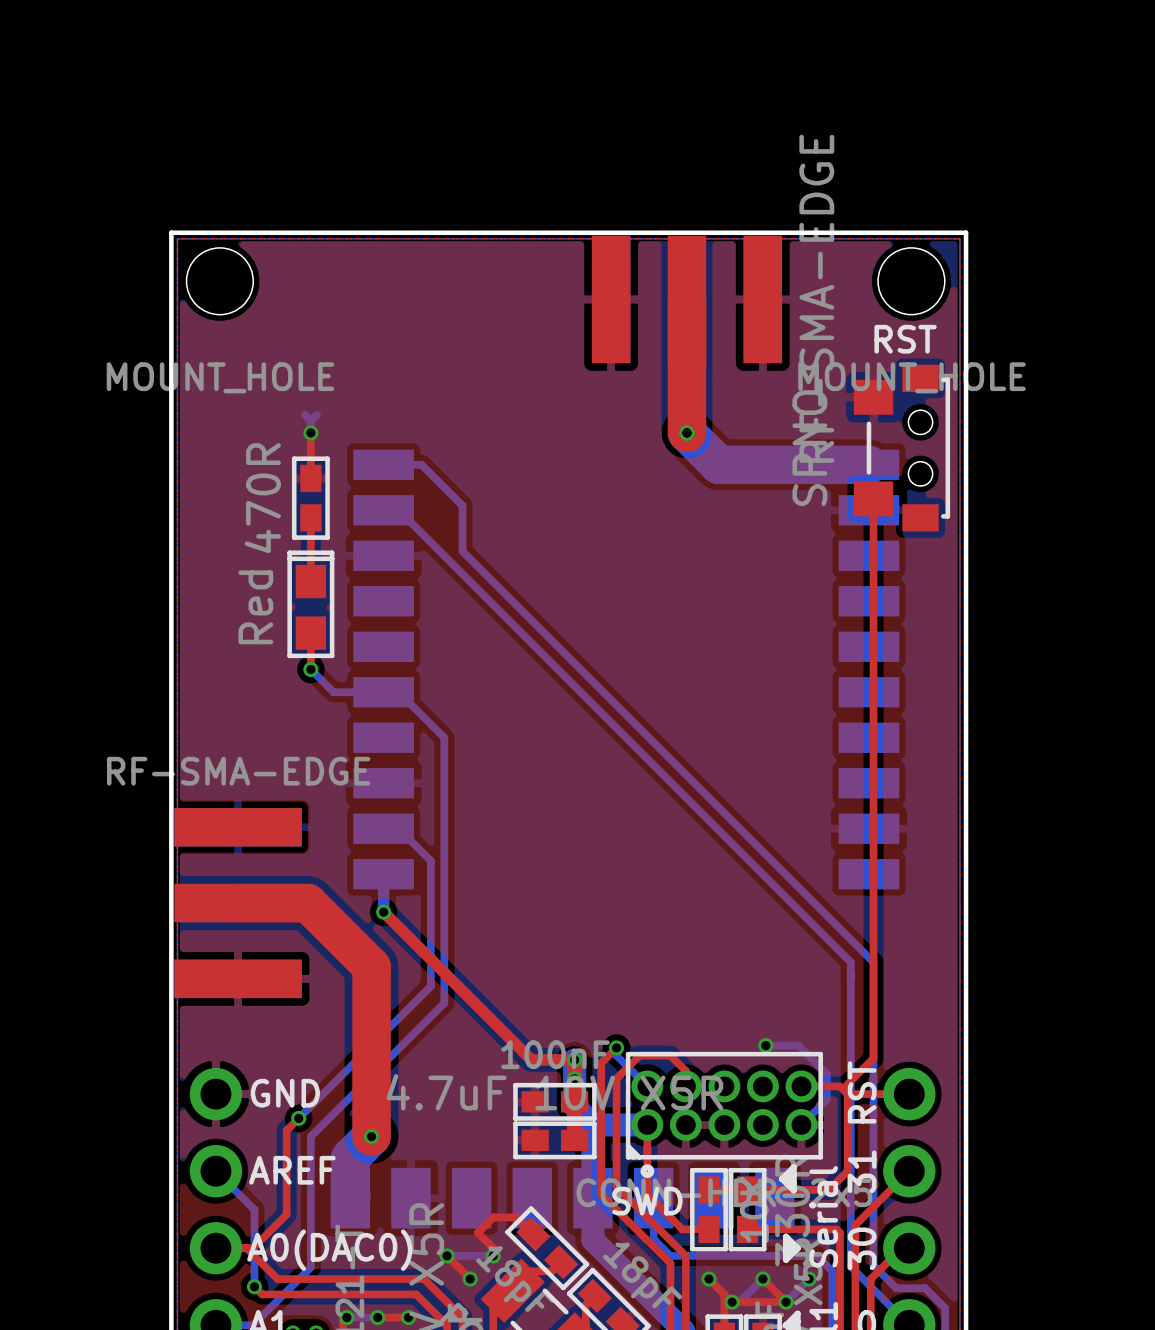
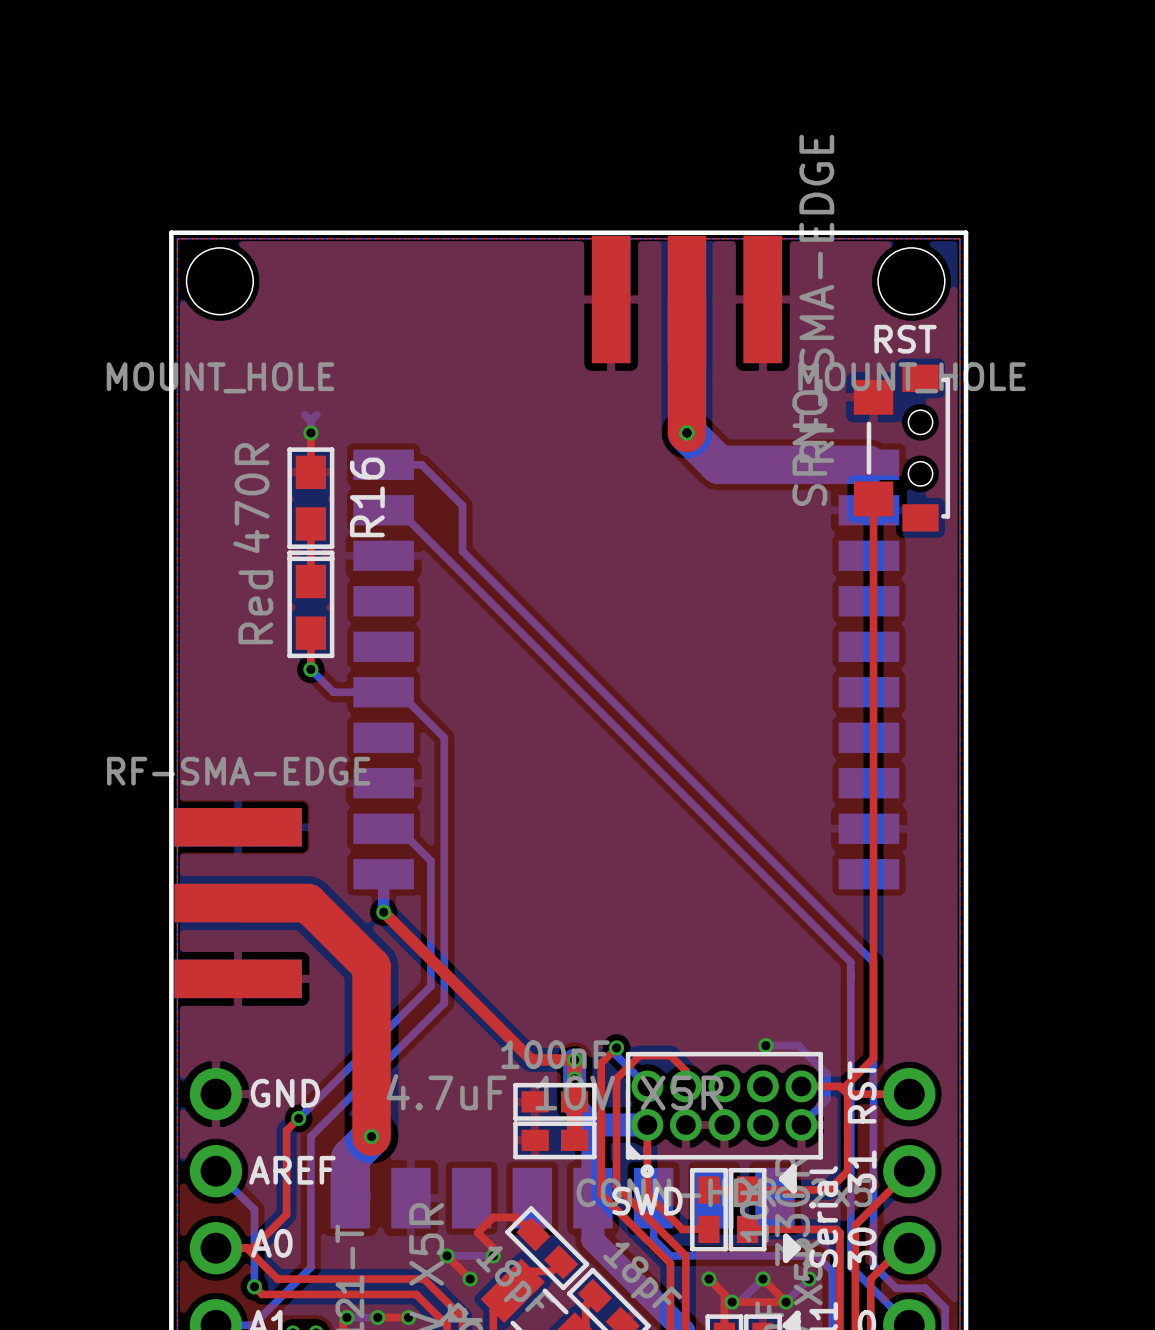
part: 470R (310, 498) -> none
R16: none -> 470R (310, 498)
text: none -> A0 (271, 1243)
text: A0(DAC0) (329, 1250) -> none

